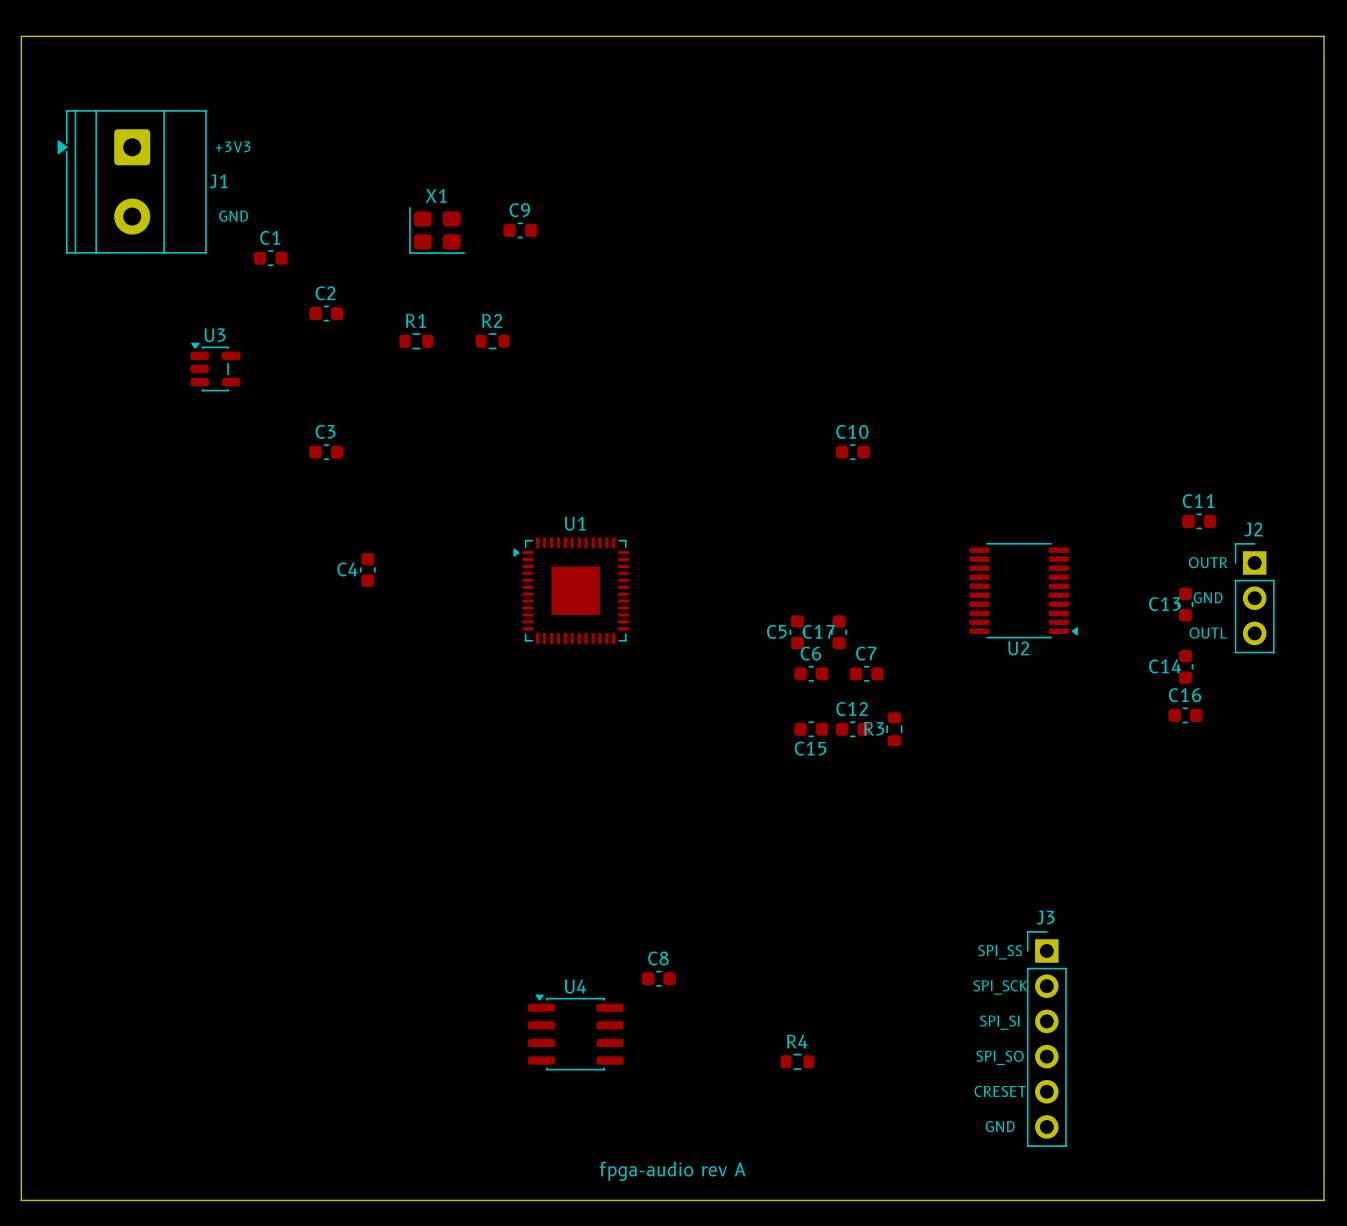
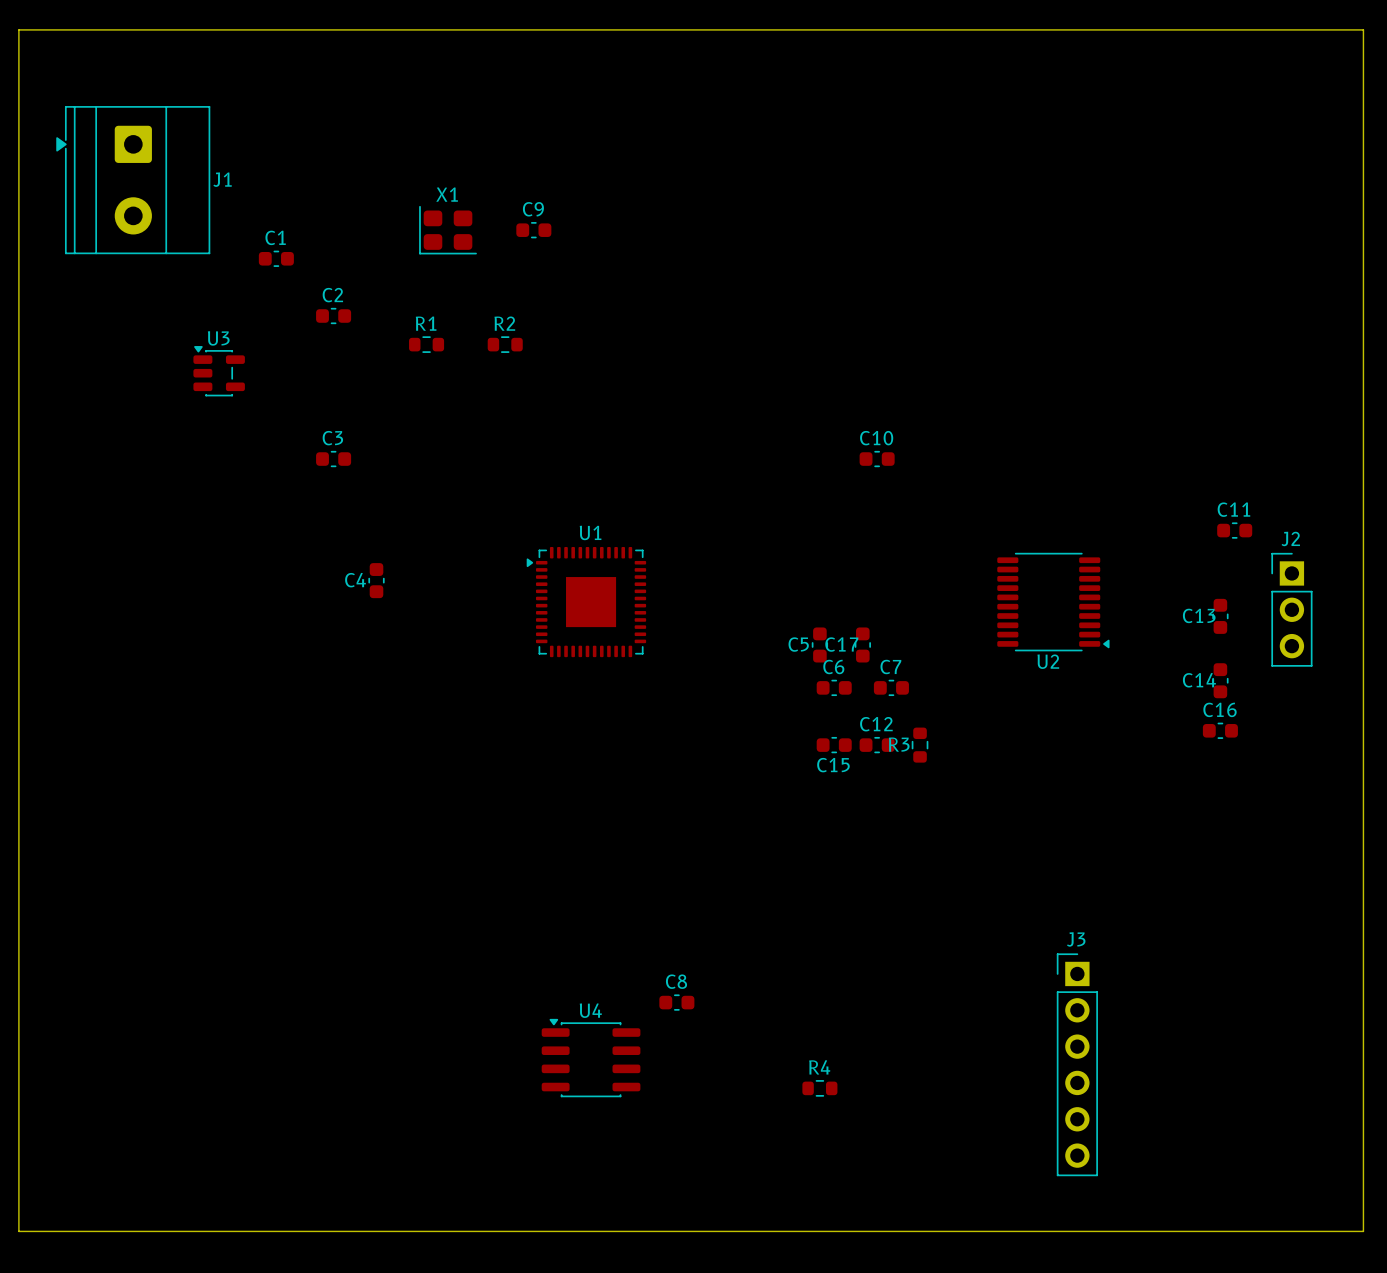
text: +3V3 (233, 146) -> none
text: GND (233, 216) -> none
text: OUTR (1208, 562) -> none
text: GND (1208, 597) -> none
text: OUTL (1208, 633) -> none
text: SPI_SS (1000, 952) -> none
text: SPI_SCK (1000, 987) -> none
text: SPI_SI (999, 1022) -> none
text: SPI_SO (999, 1057) -> none
text: CRESET (1000, 1091) -> none
text: GND (1000, 1126) -> none
text: fpga-audio rev A (672, 1171) -> none

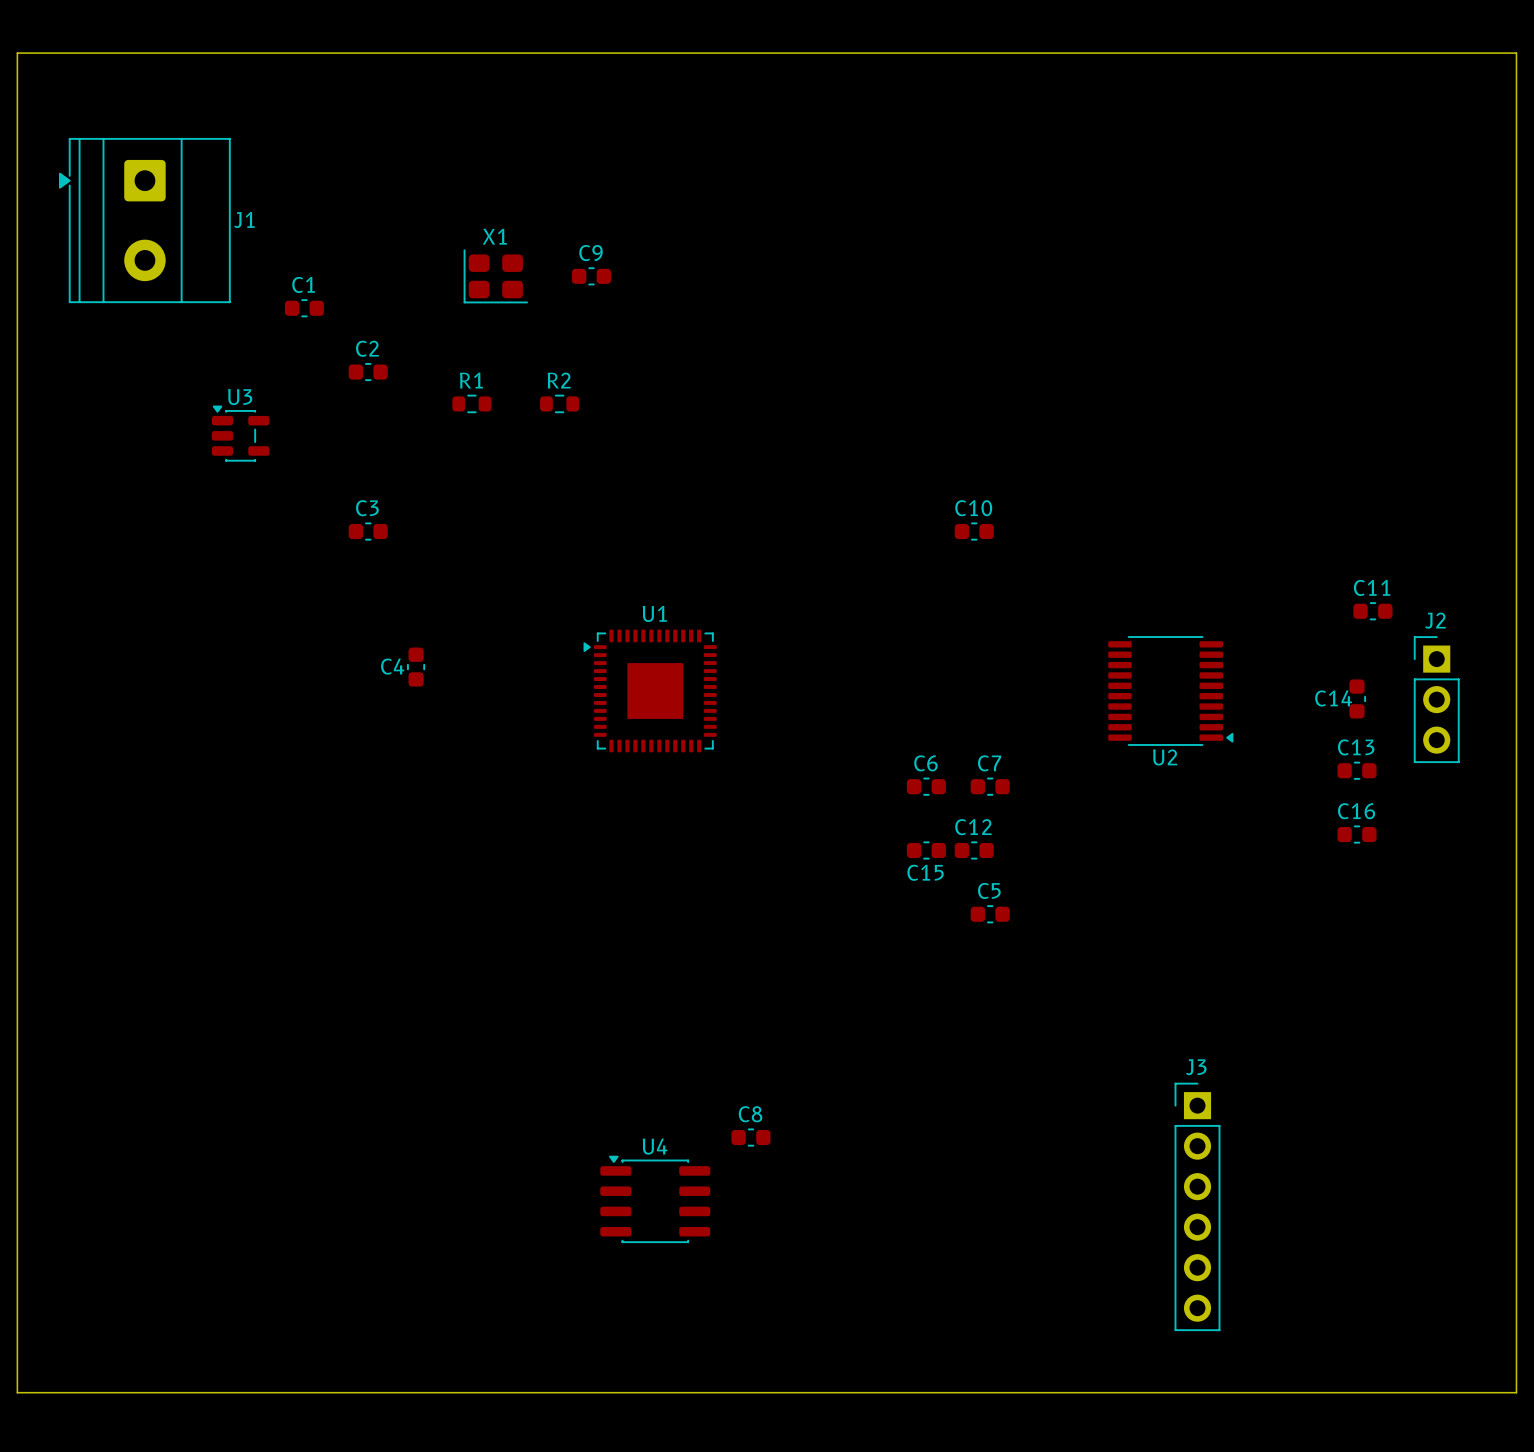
C13 rotation: 0° (1220, 616) -> 90° clockwise (1356, 770)
C13 position: (1220, 616) -> (1356, 770)
C5 rotation: 0° (819, 644) -> 90° clockwise (990, 914)
C5 position: (819, 644) -> (990, 914)
C17: (862, 644) -> none
C14 position: (1220, 680) -> (1356, 698)
R3: (920, 745) -> none
R4: (819, 1088) -> none

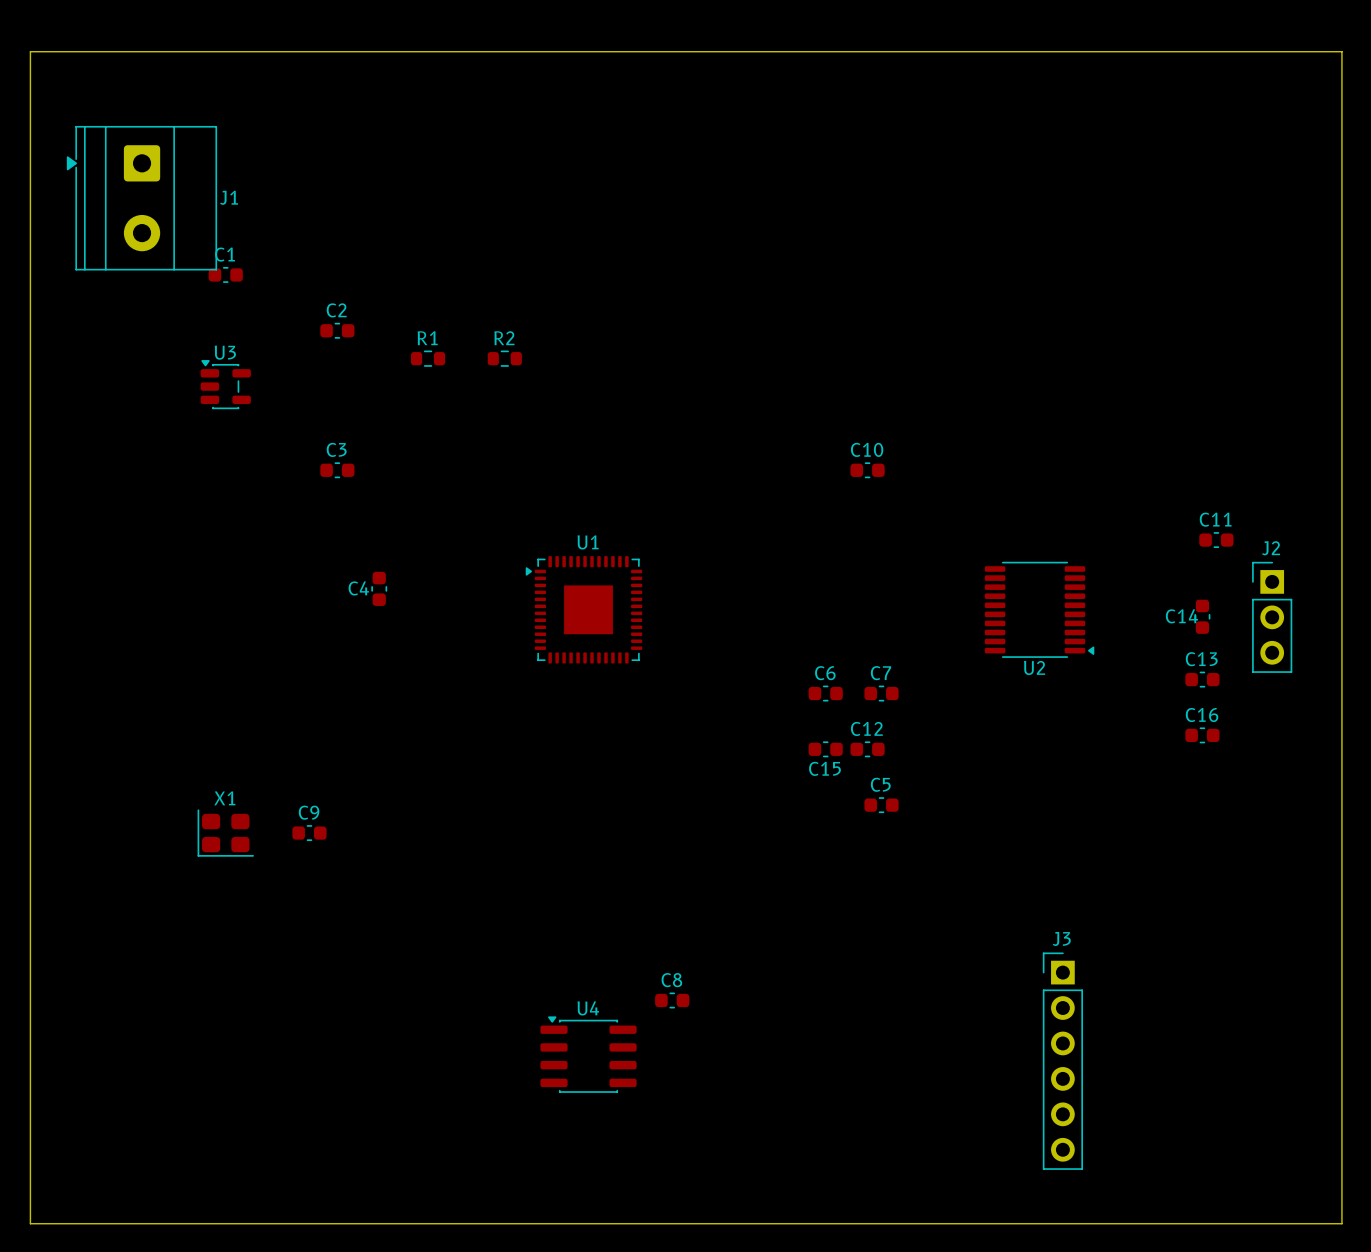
X1 position: (495, 276) -> (225, 833)
C9 position: (591, 276) -> (309, 833)
C1 position: (304, 308) -> (225, 274)

